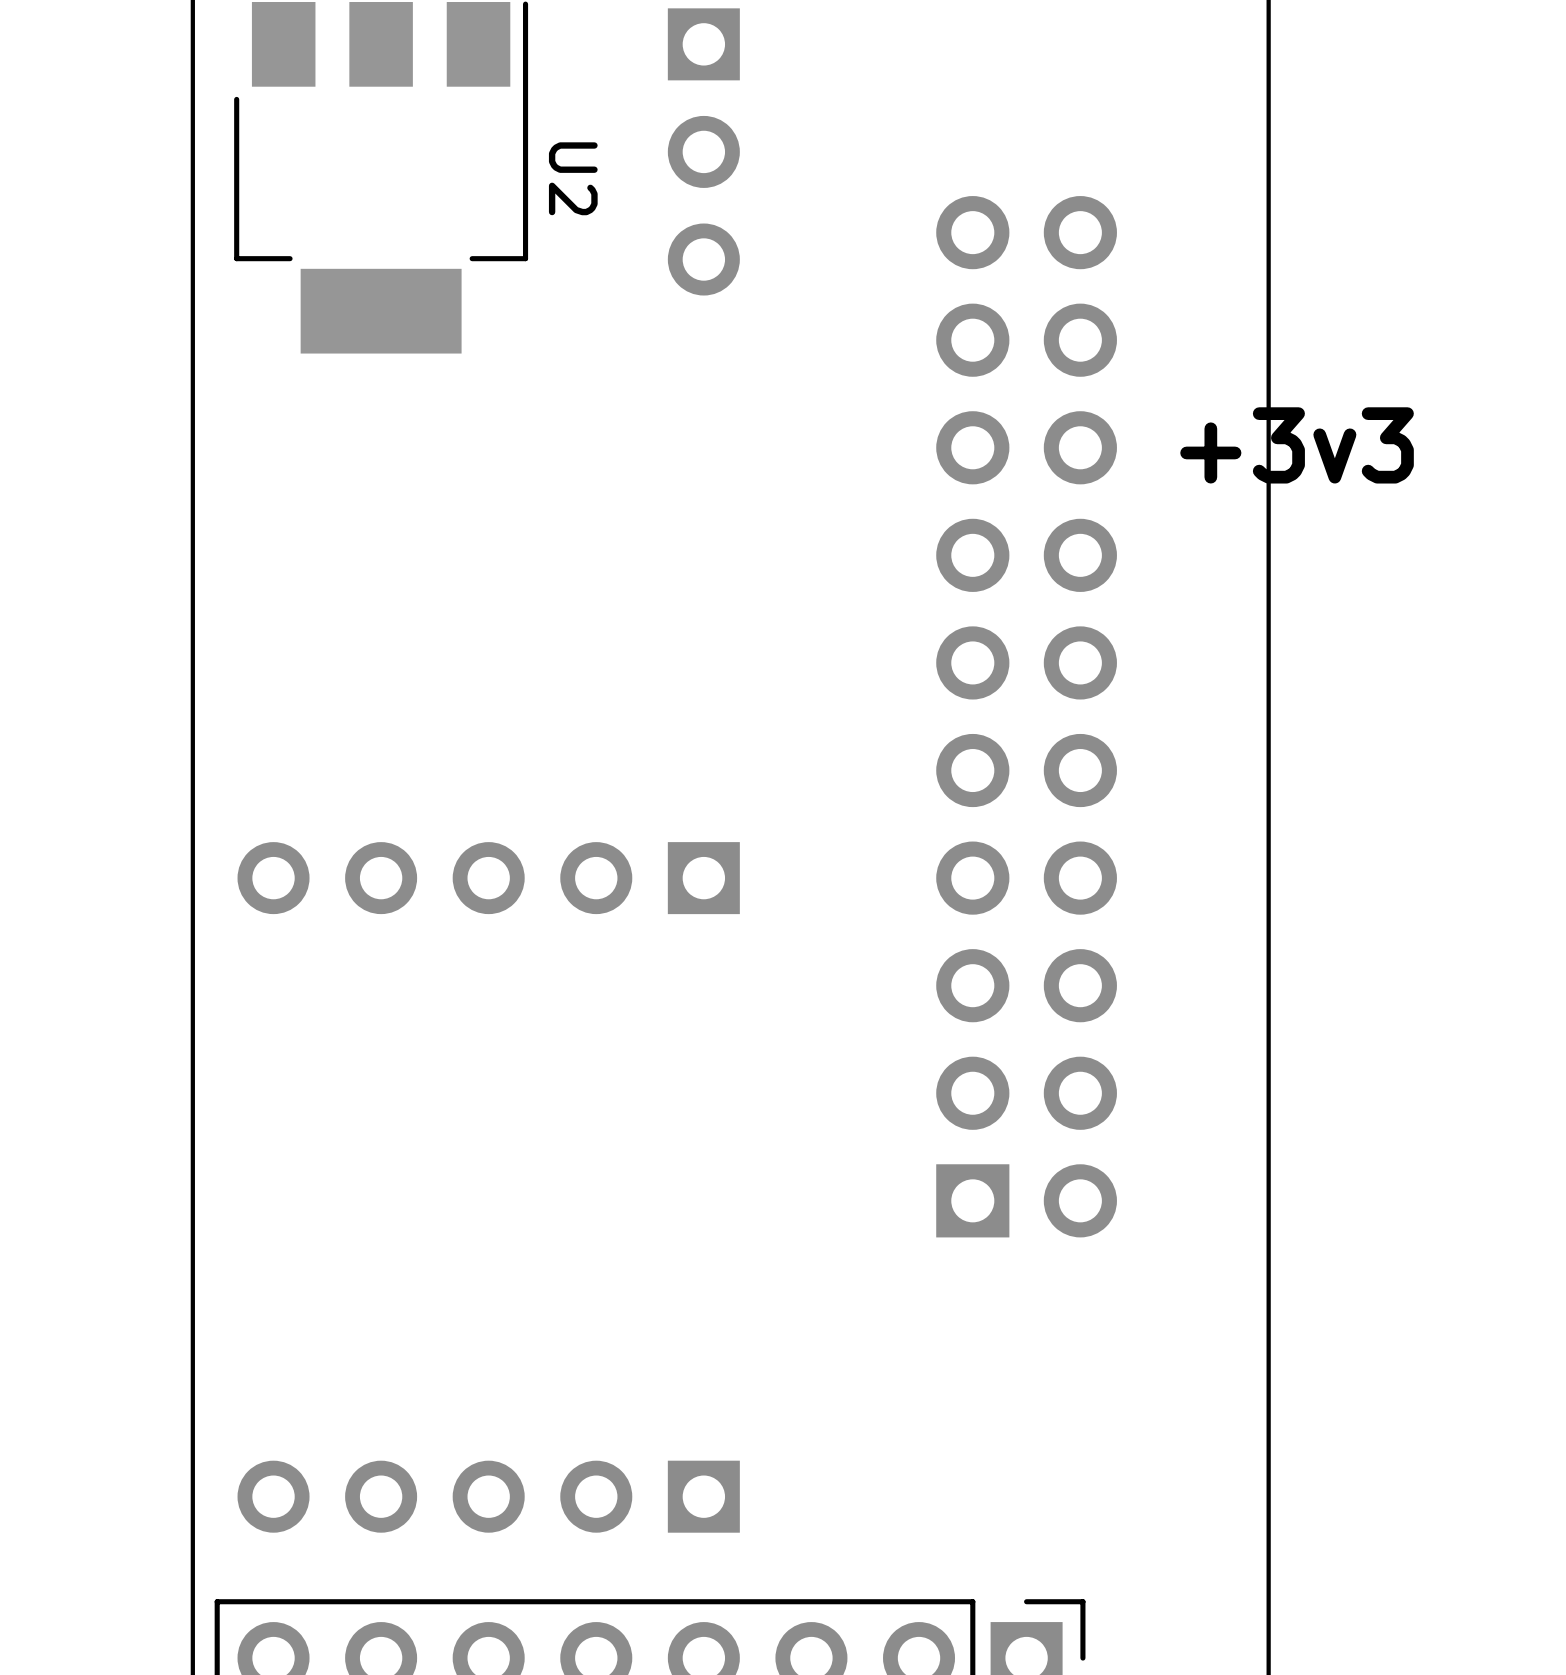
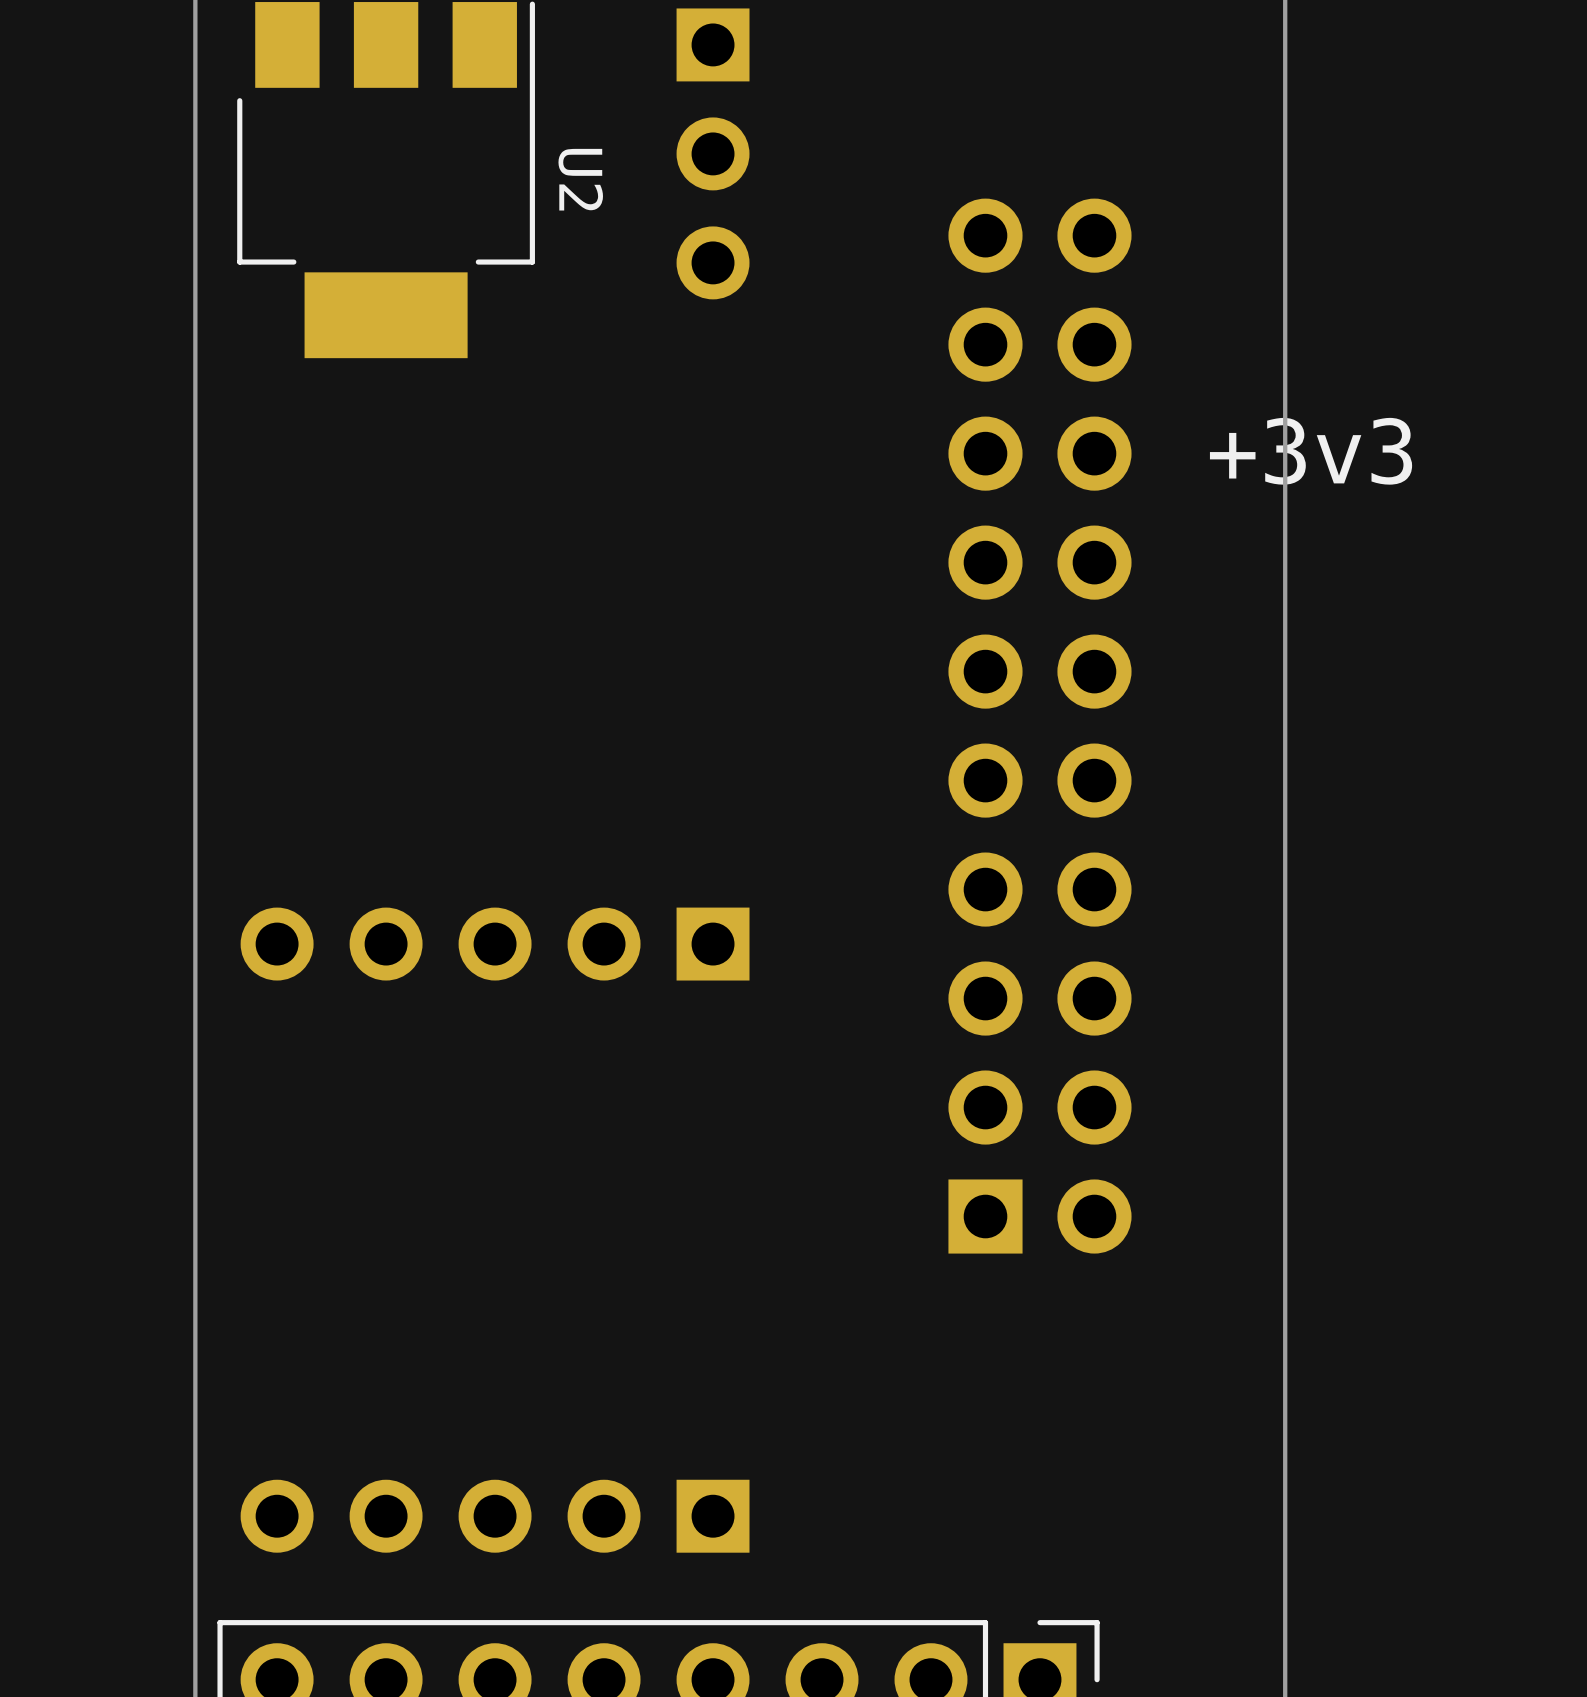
part position: (488, 878) -> (495, 944)

